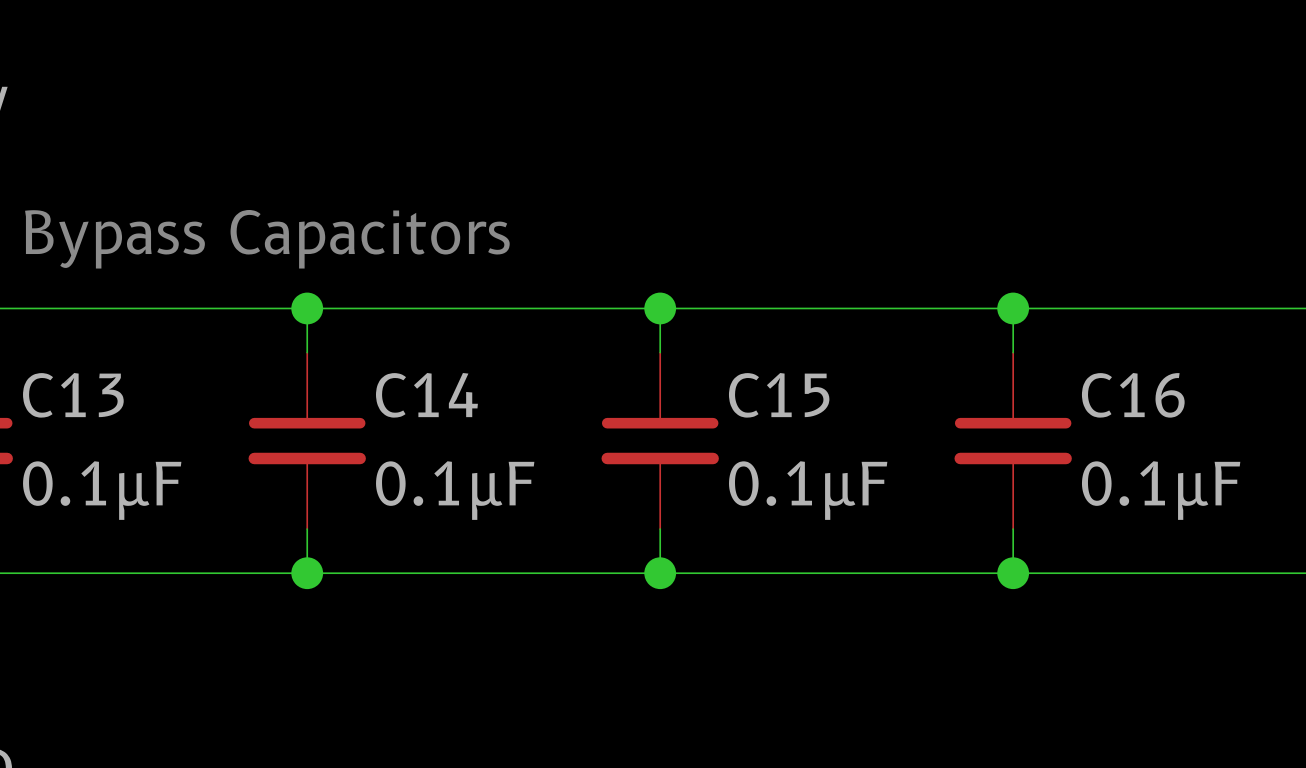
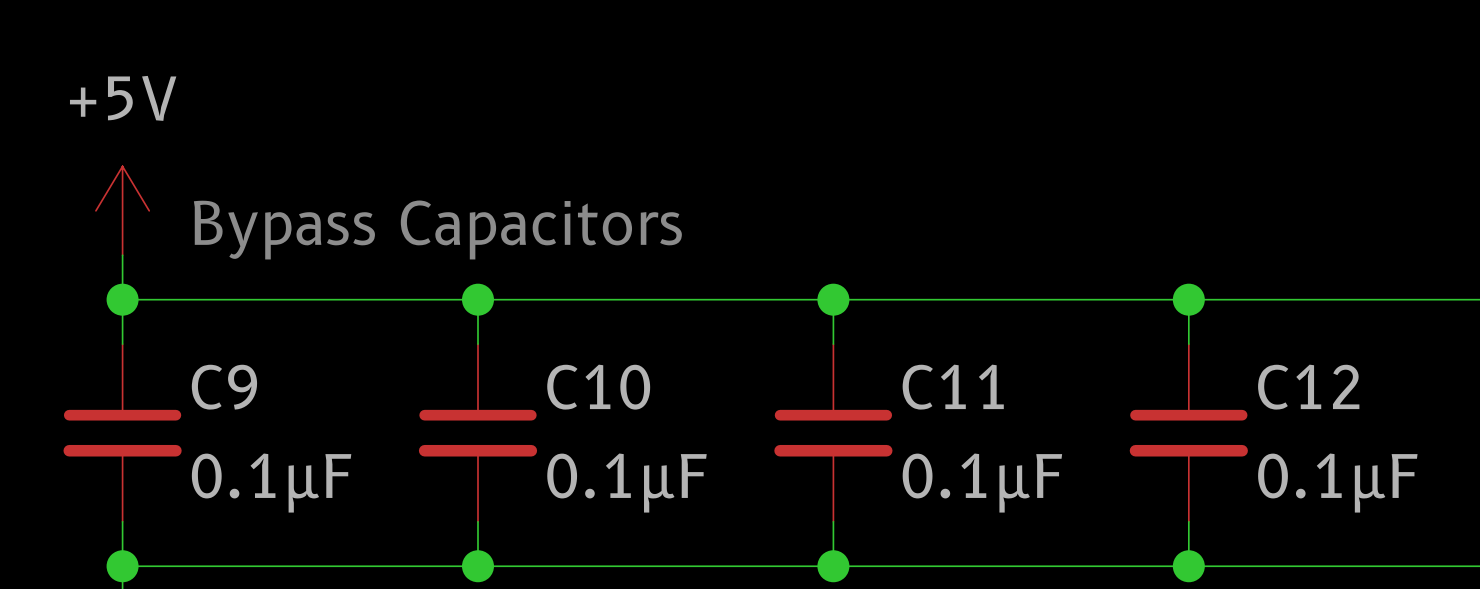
C13 name: C13 (73, 395) -> C9 (224, 387)
C14 name: C14 (426, 395) -> C10 (598, 387)
C15 name: C15 (779, 395) -> C11 (953, 387)
C16 name: C16 (1133, 395) -> C12 (1308, 387)

